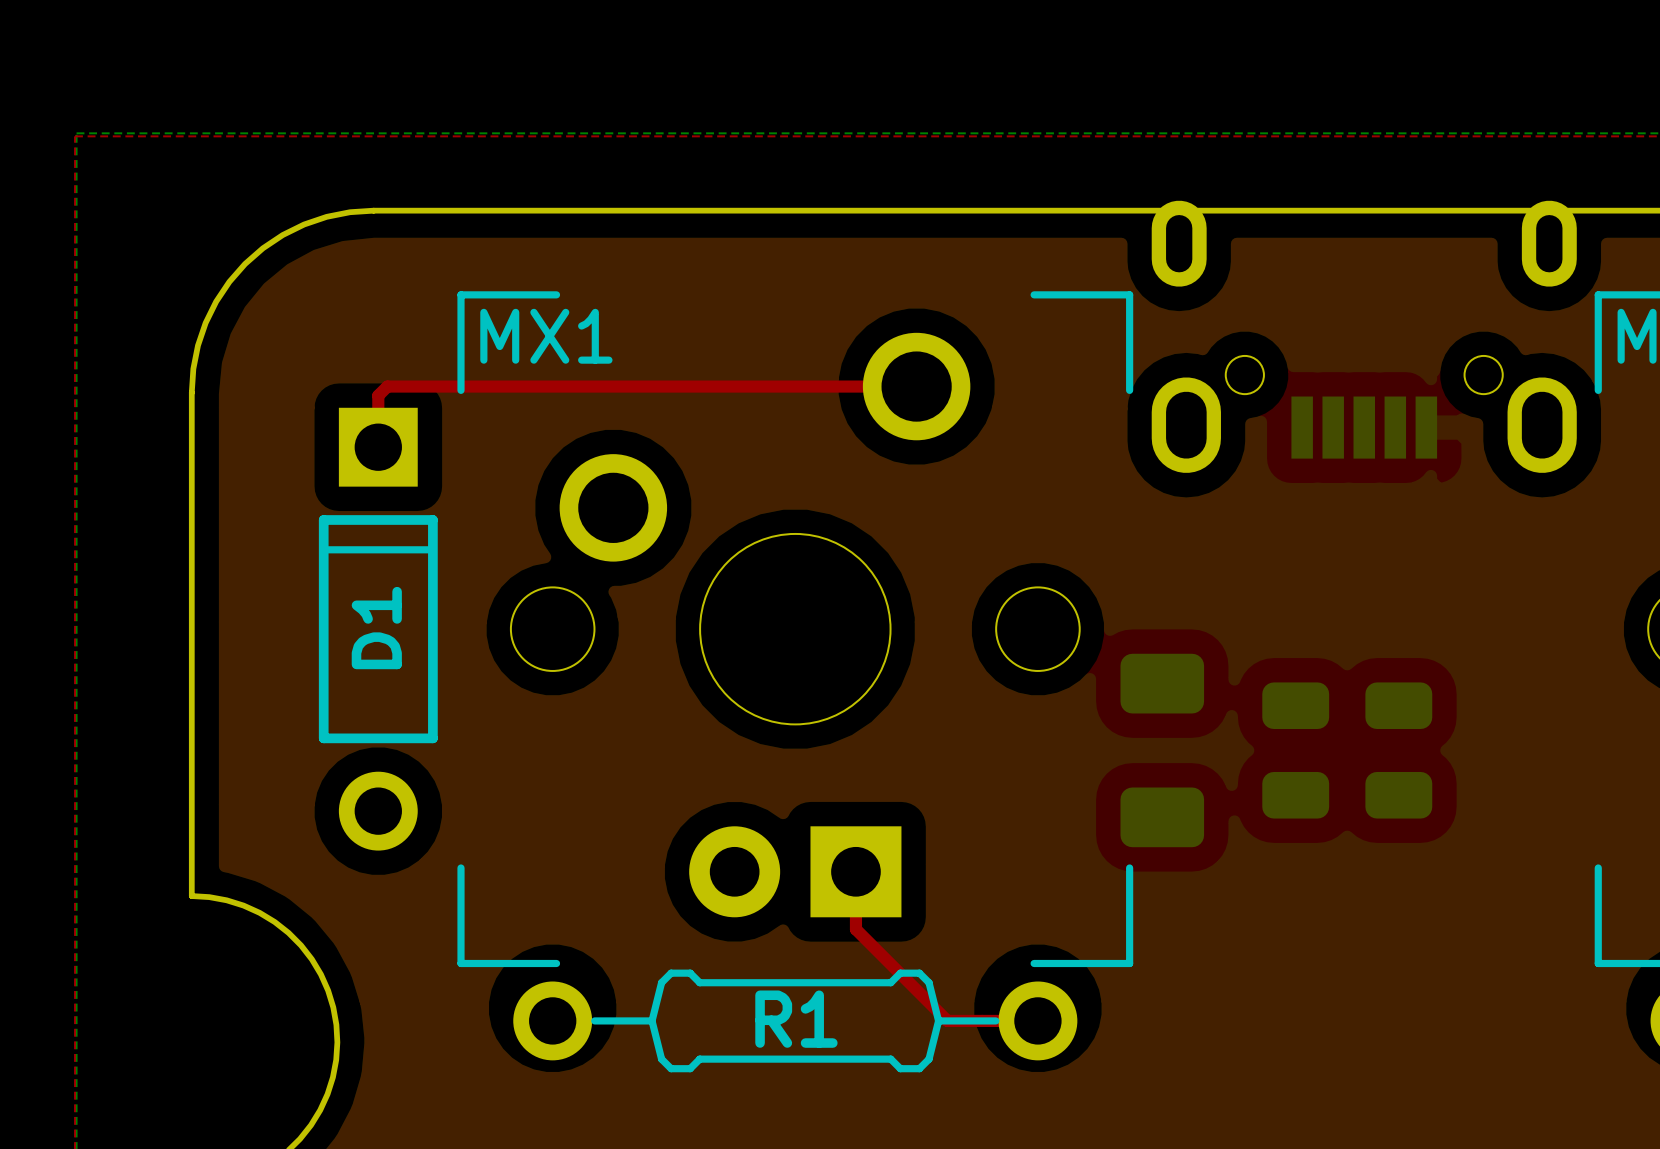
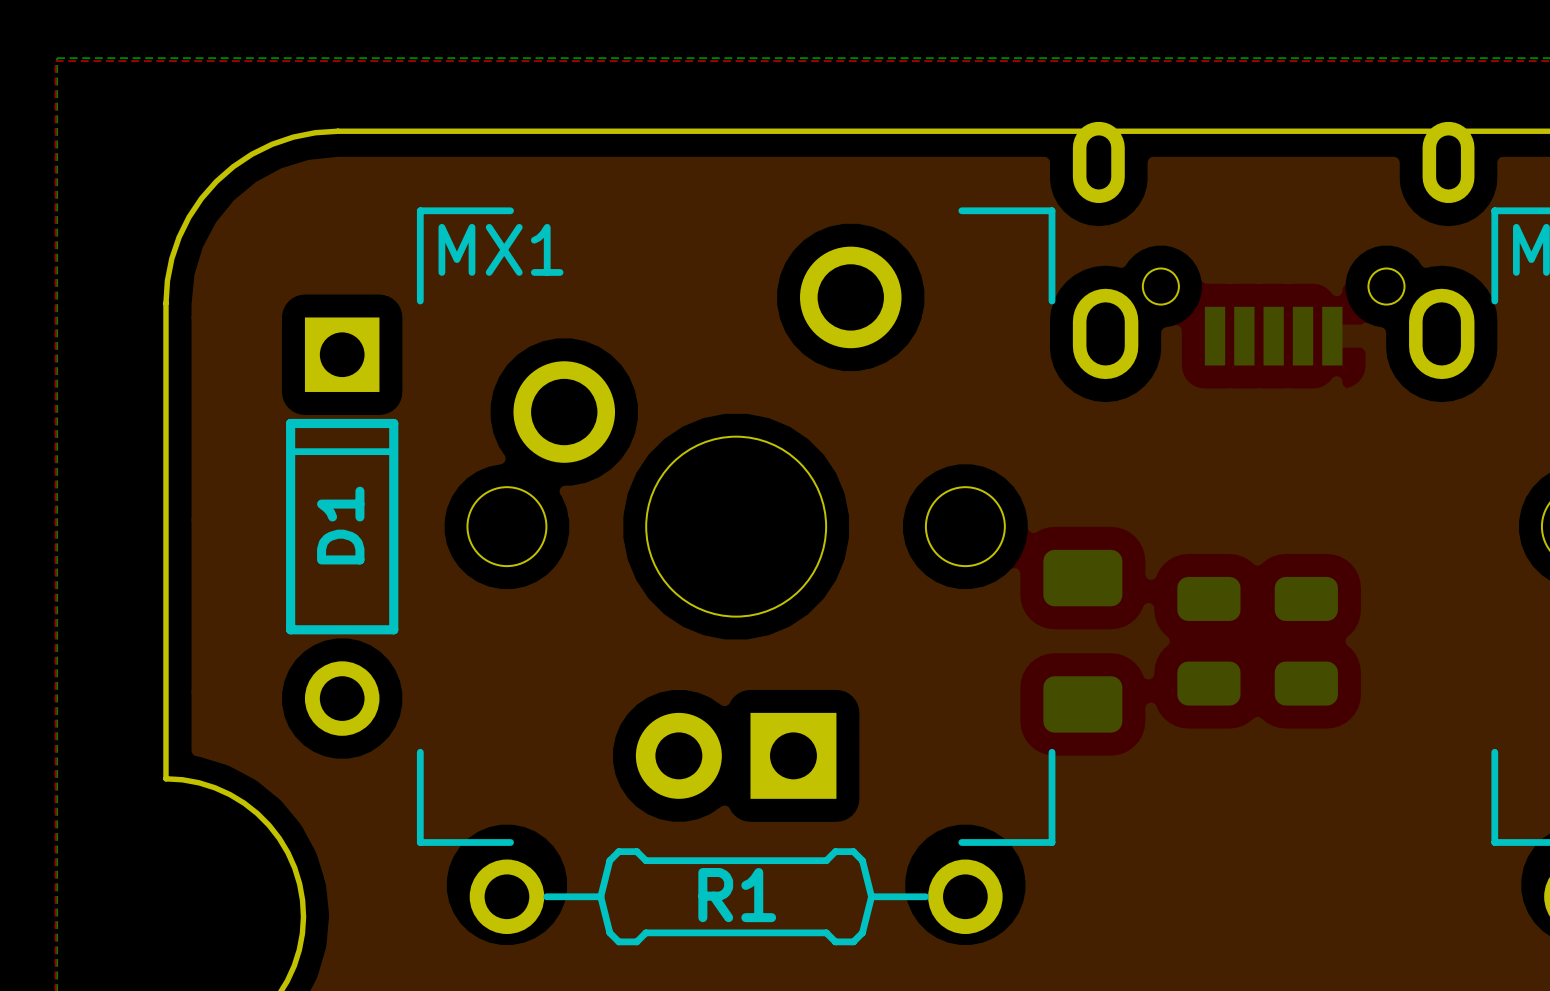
top track: (916, 386) (387, 386) (378, 395) (378, 447) -> none
top track: (855, 871) (855, 929) (947, 1020) (1037, 1020) -> none

